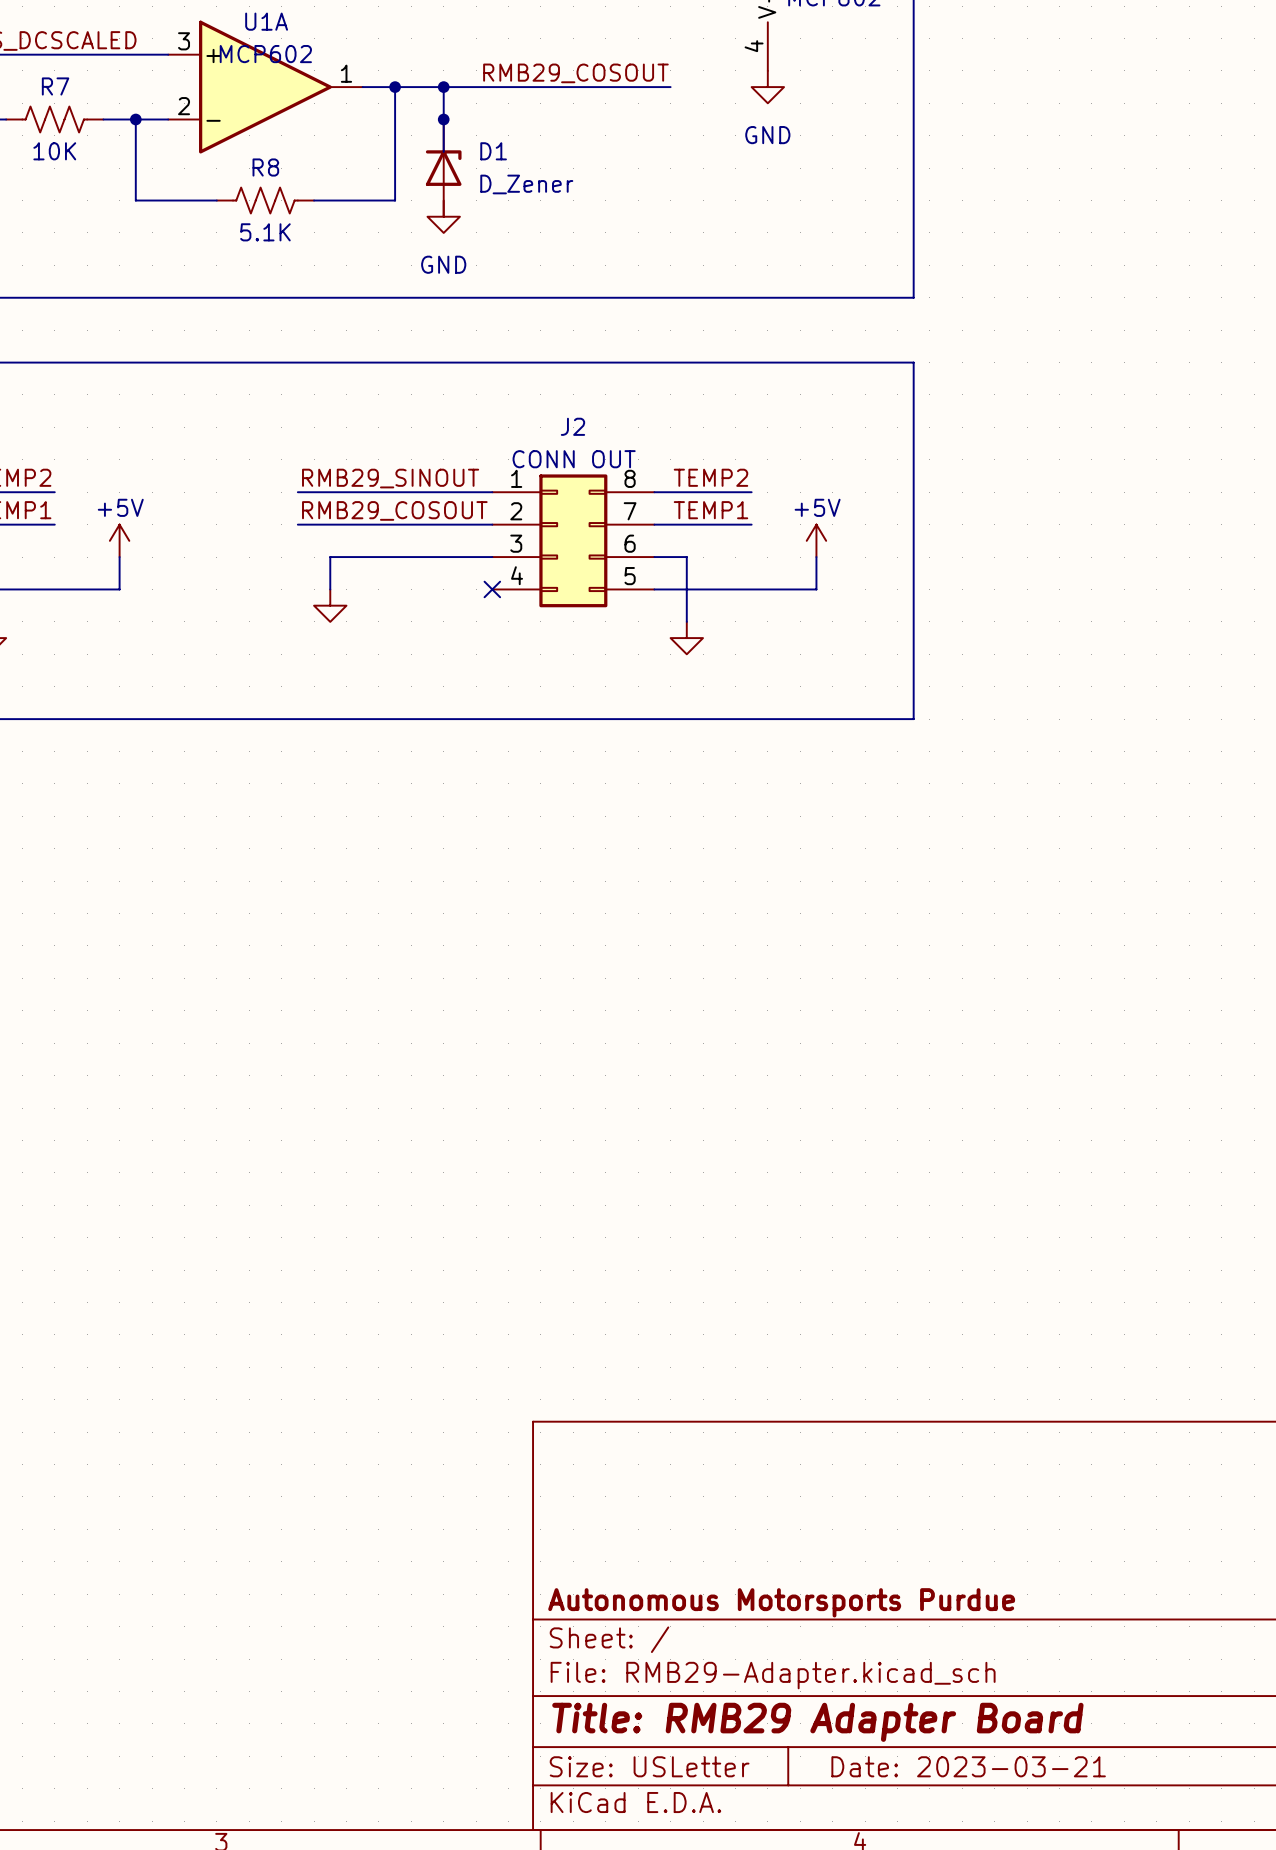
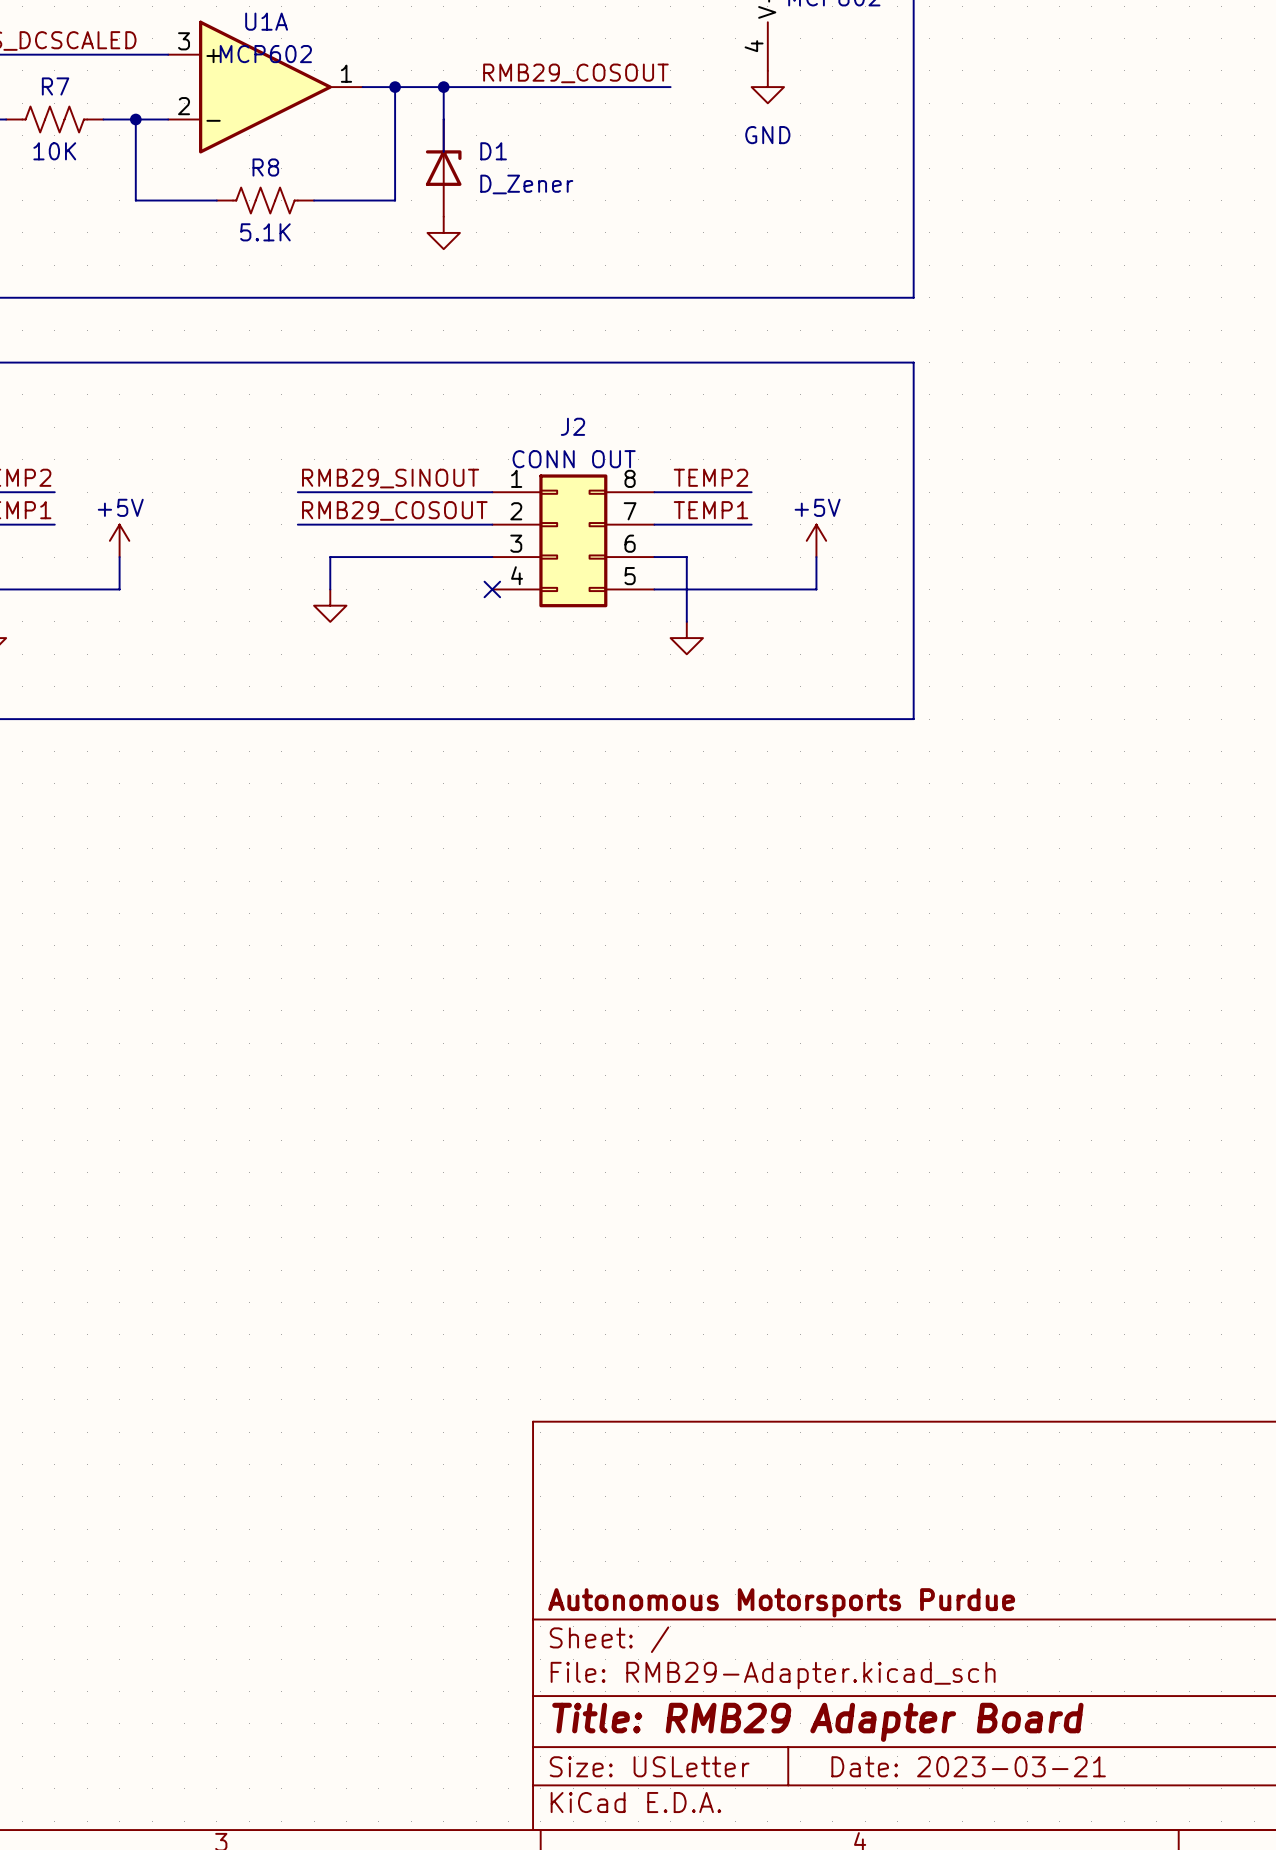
junction: (443, 119) -> none
power symbol: GND (443, 216) -> none
power symbol: none -> (443, 232)

